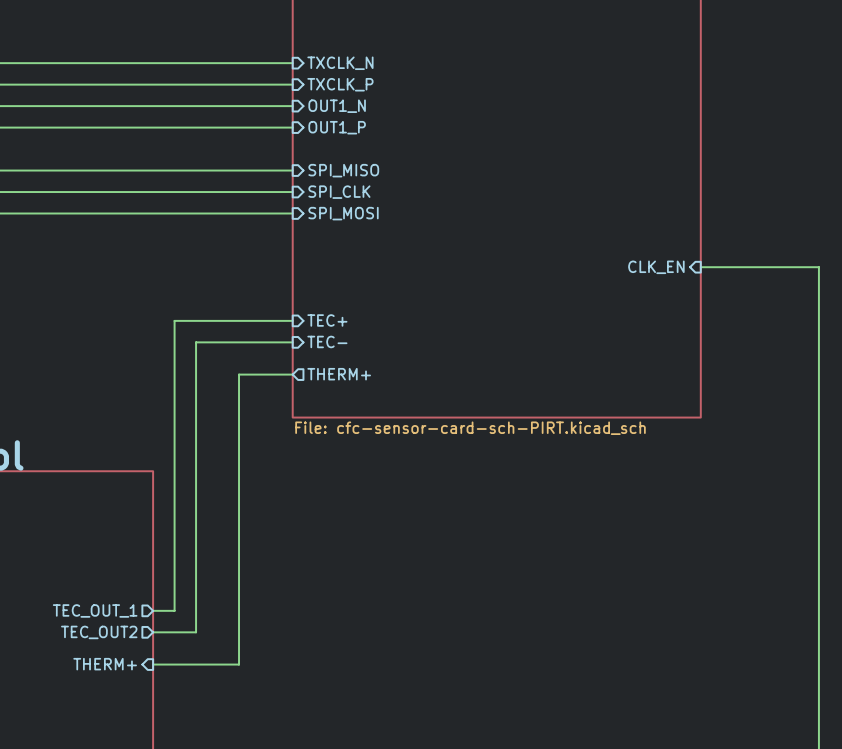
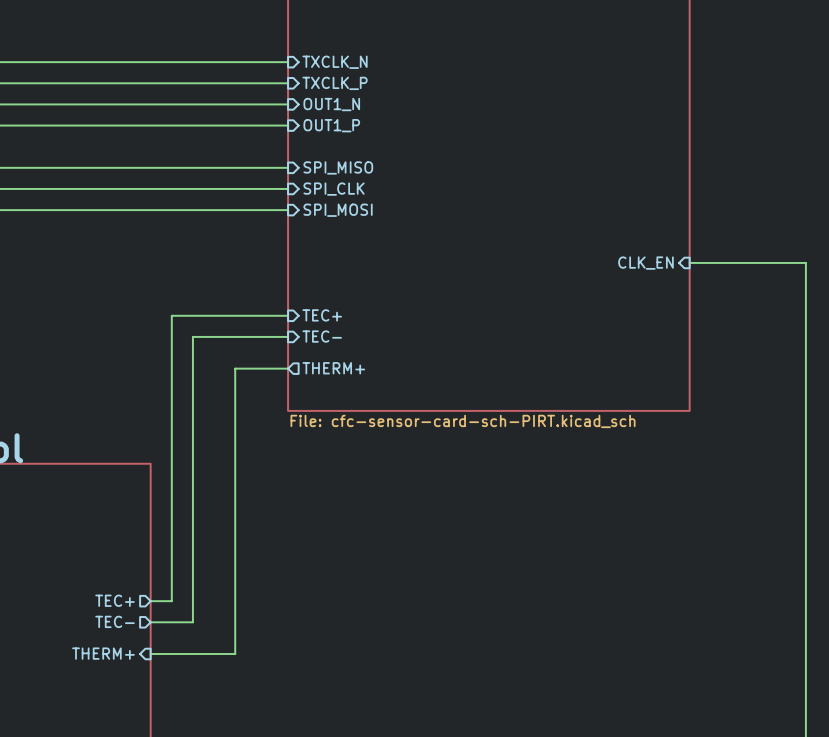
sheet pin: TEC_OUT_1 (95, 610) -> TEC+ (115, 600)
sheet pin: TEC_OUT2 (99, 632) -> TEC- (115, 621)

